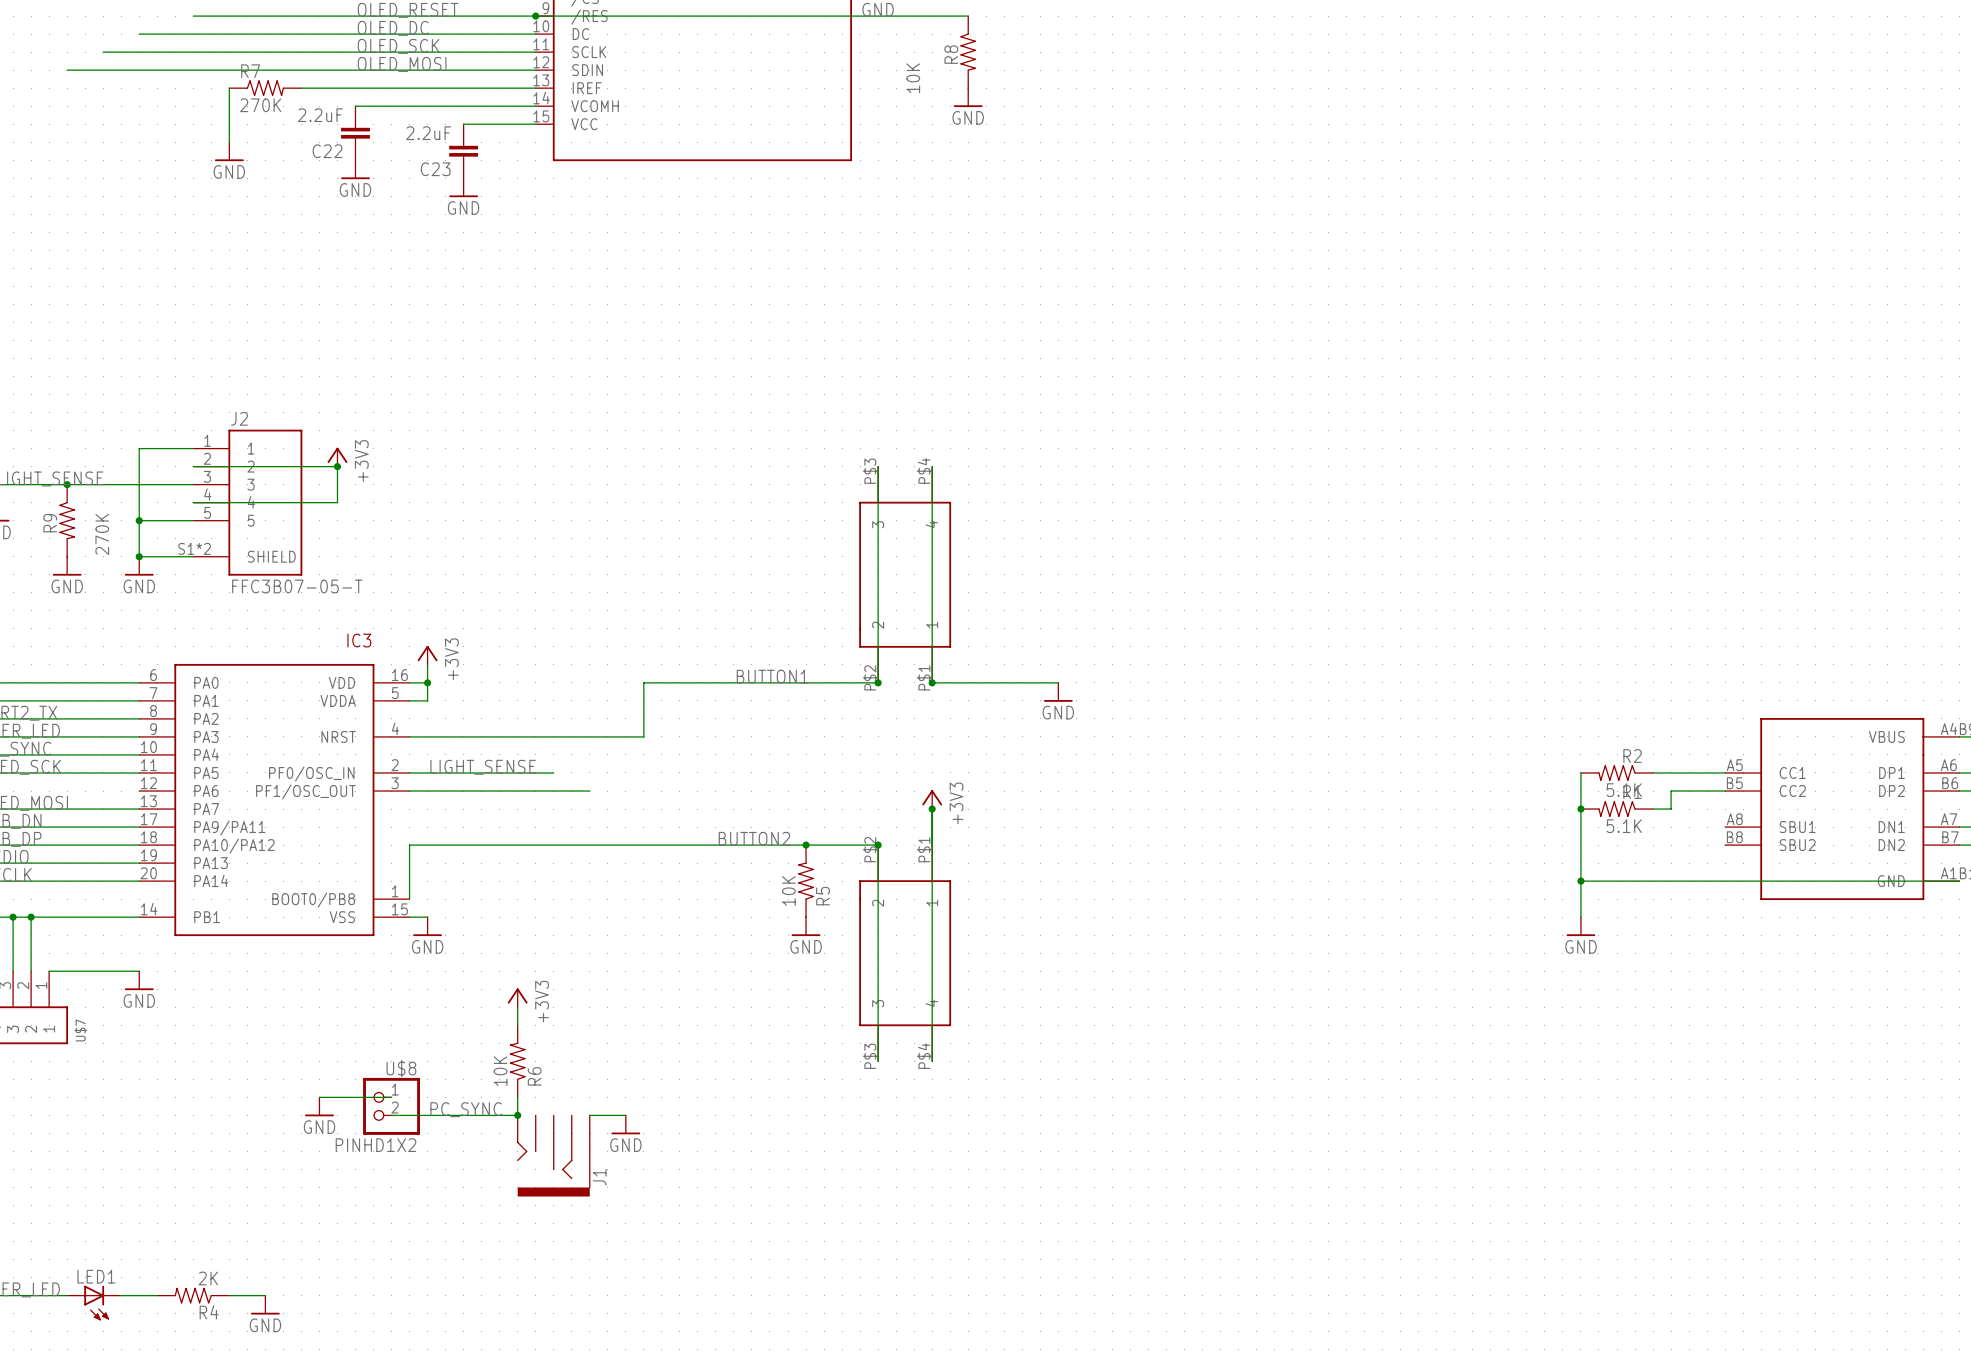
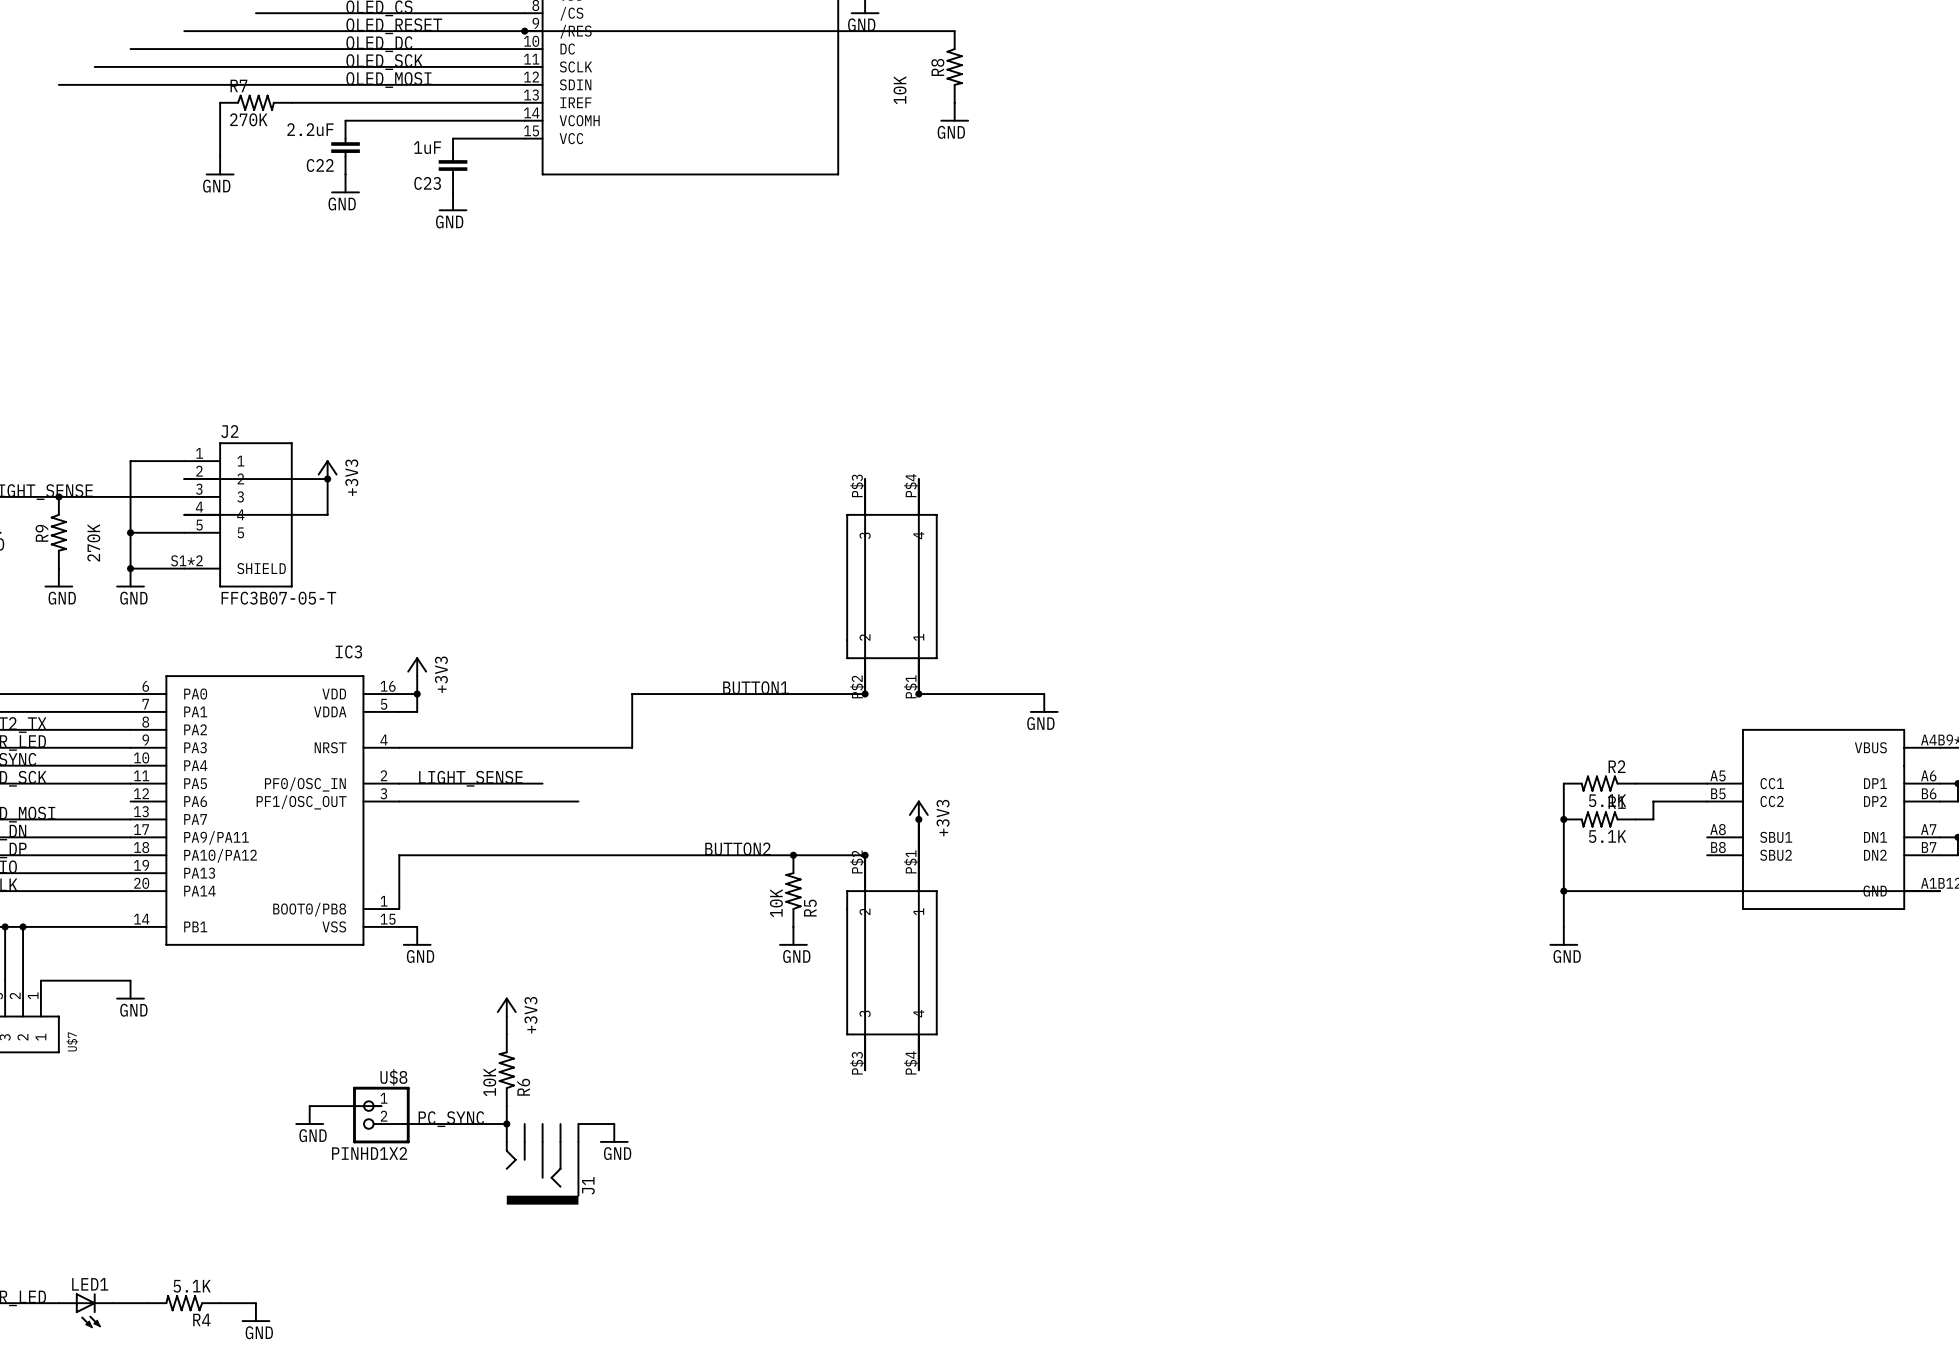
C23 value: 2.2uF (428, 133) -> 1uF (427, 147)
R4 value: 2K (208, 1278) -> 5.1K (192, 1286)

